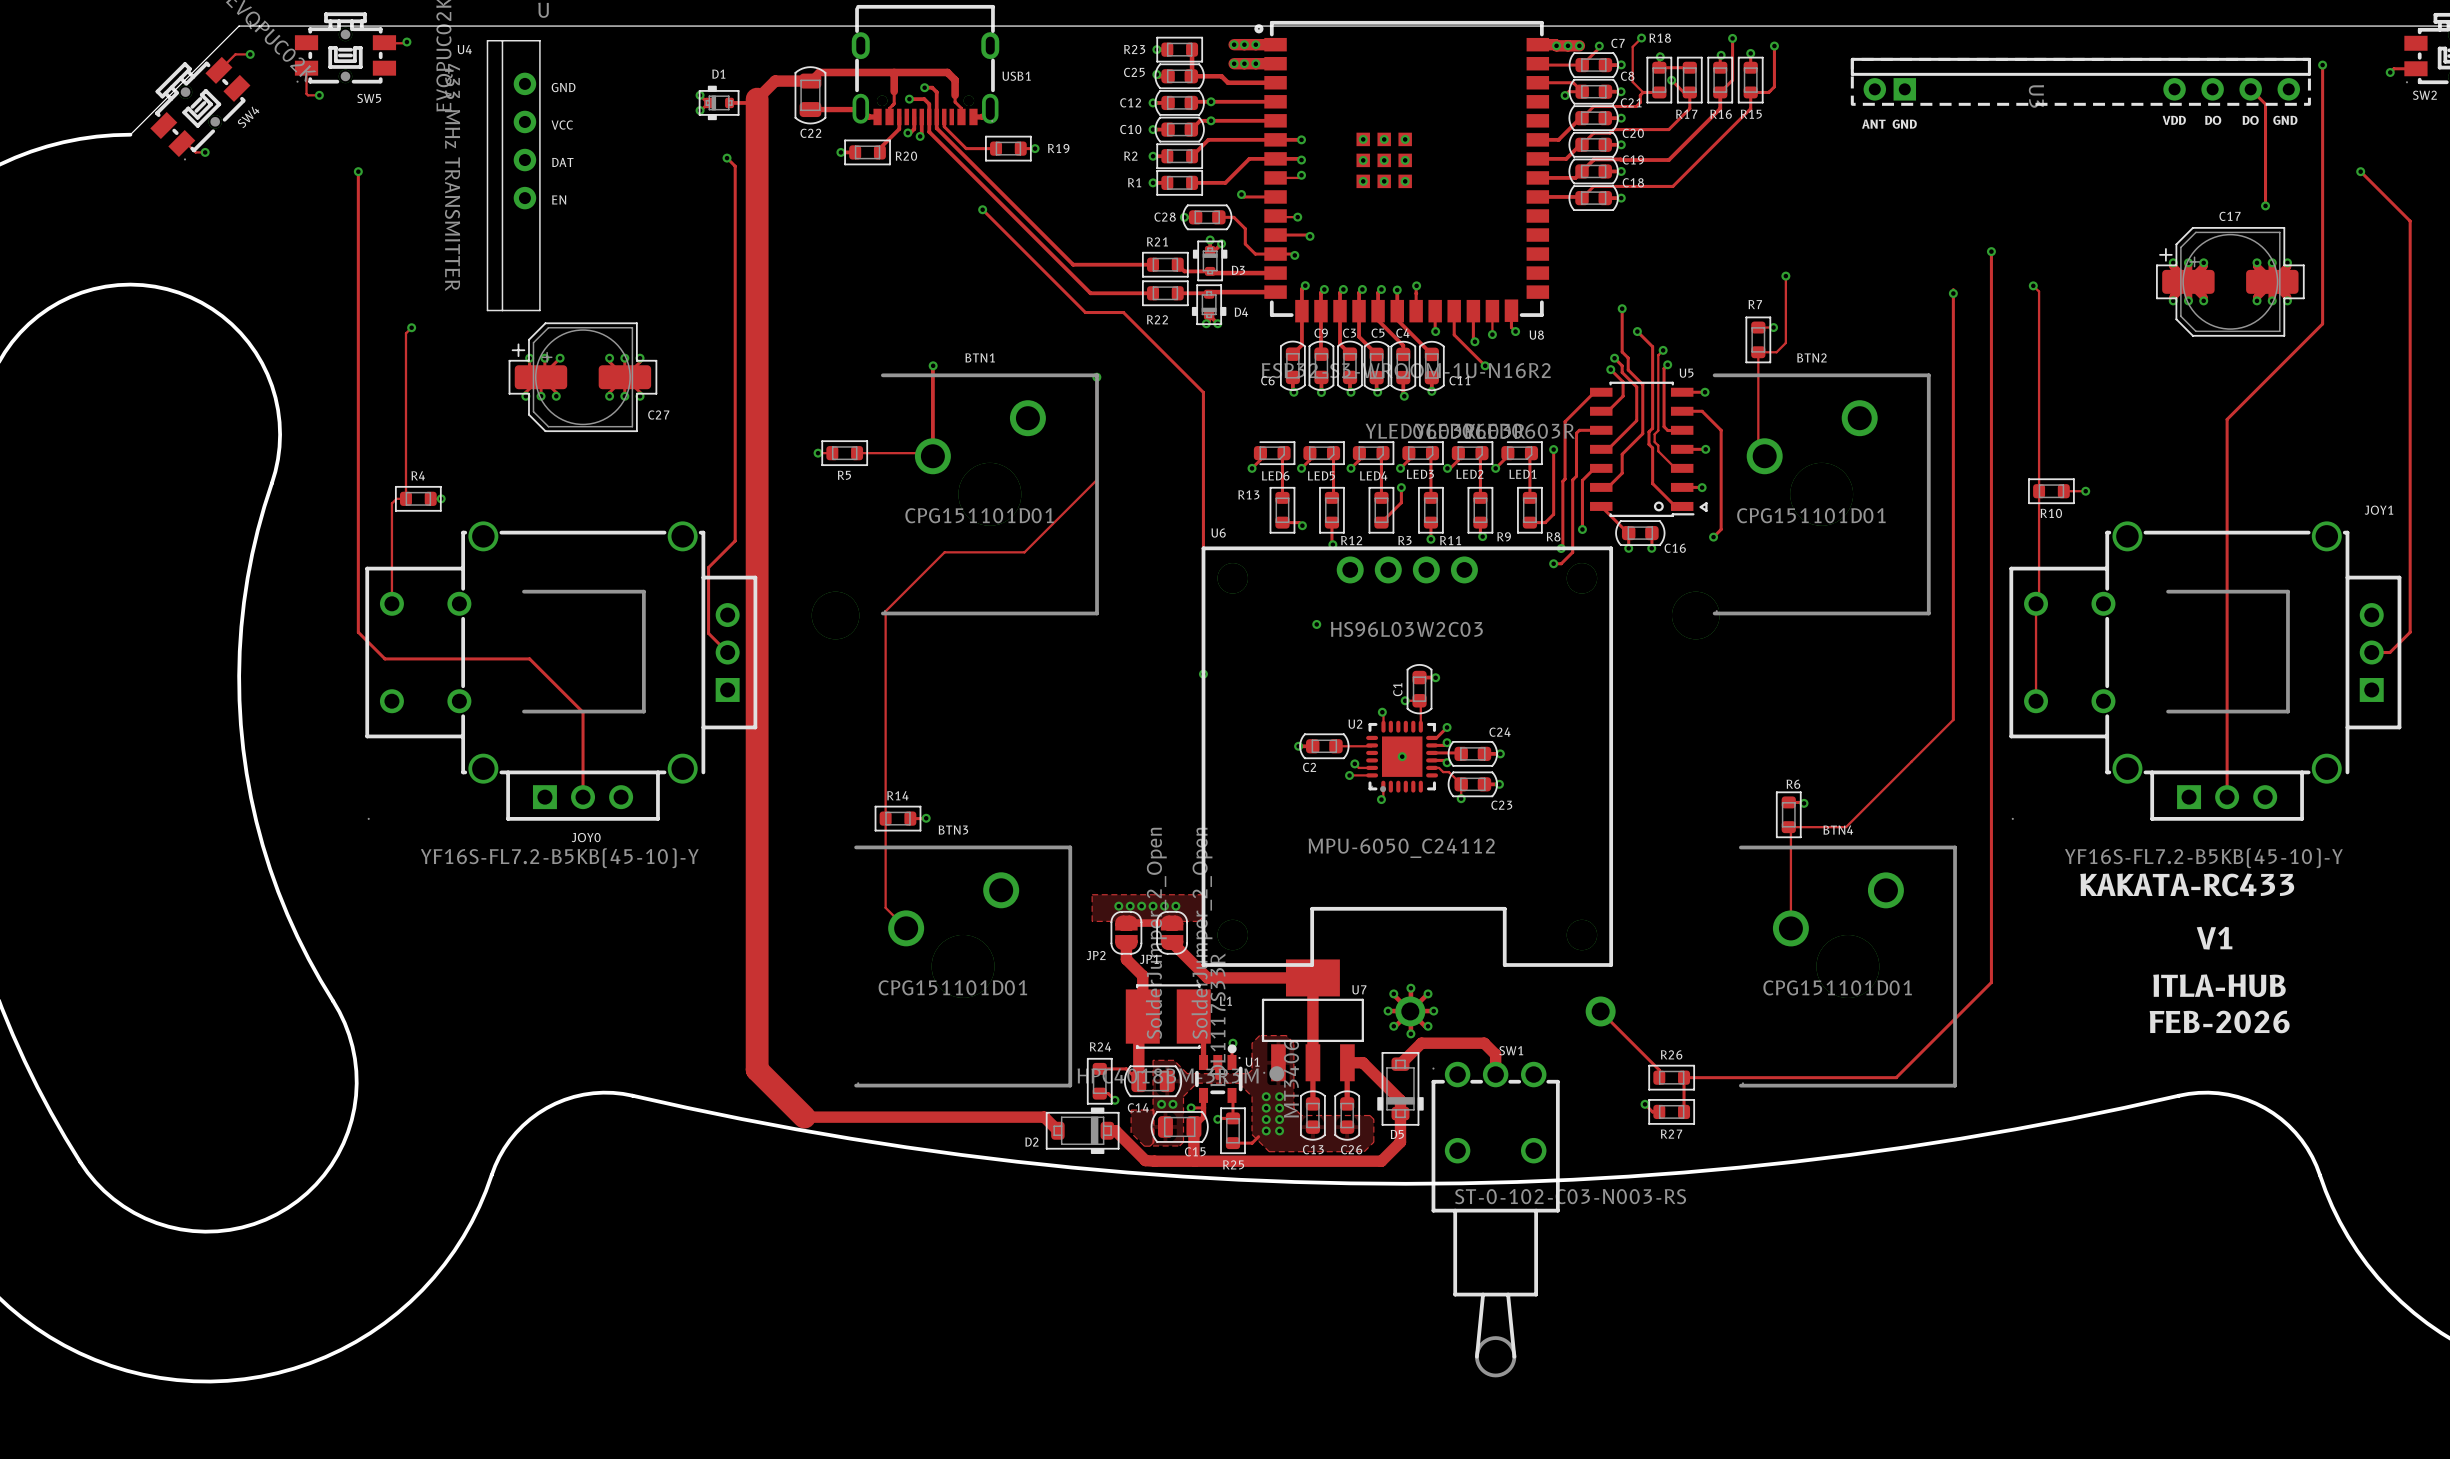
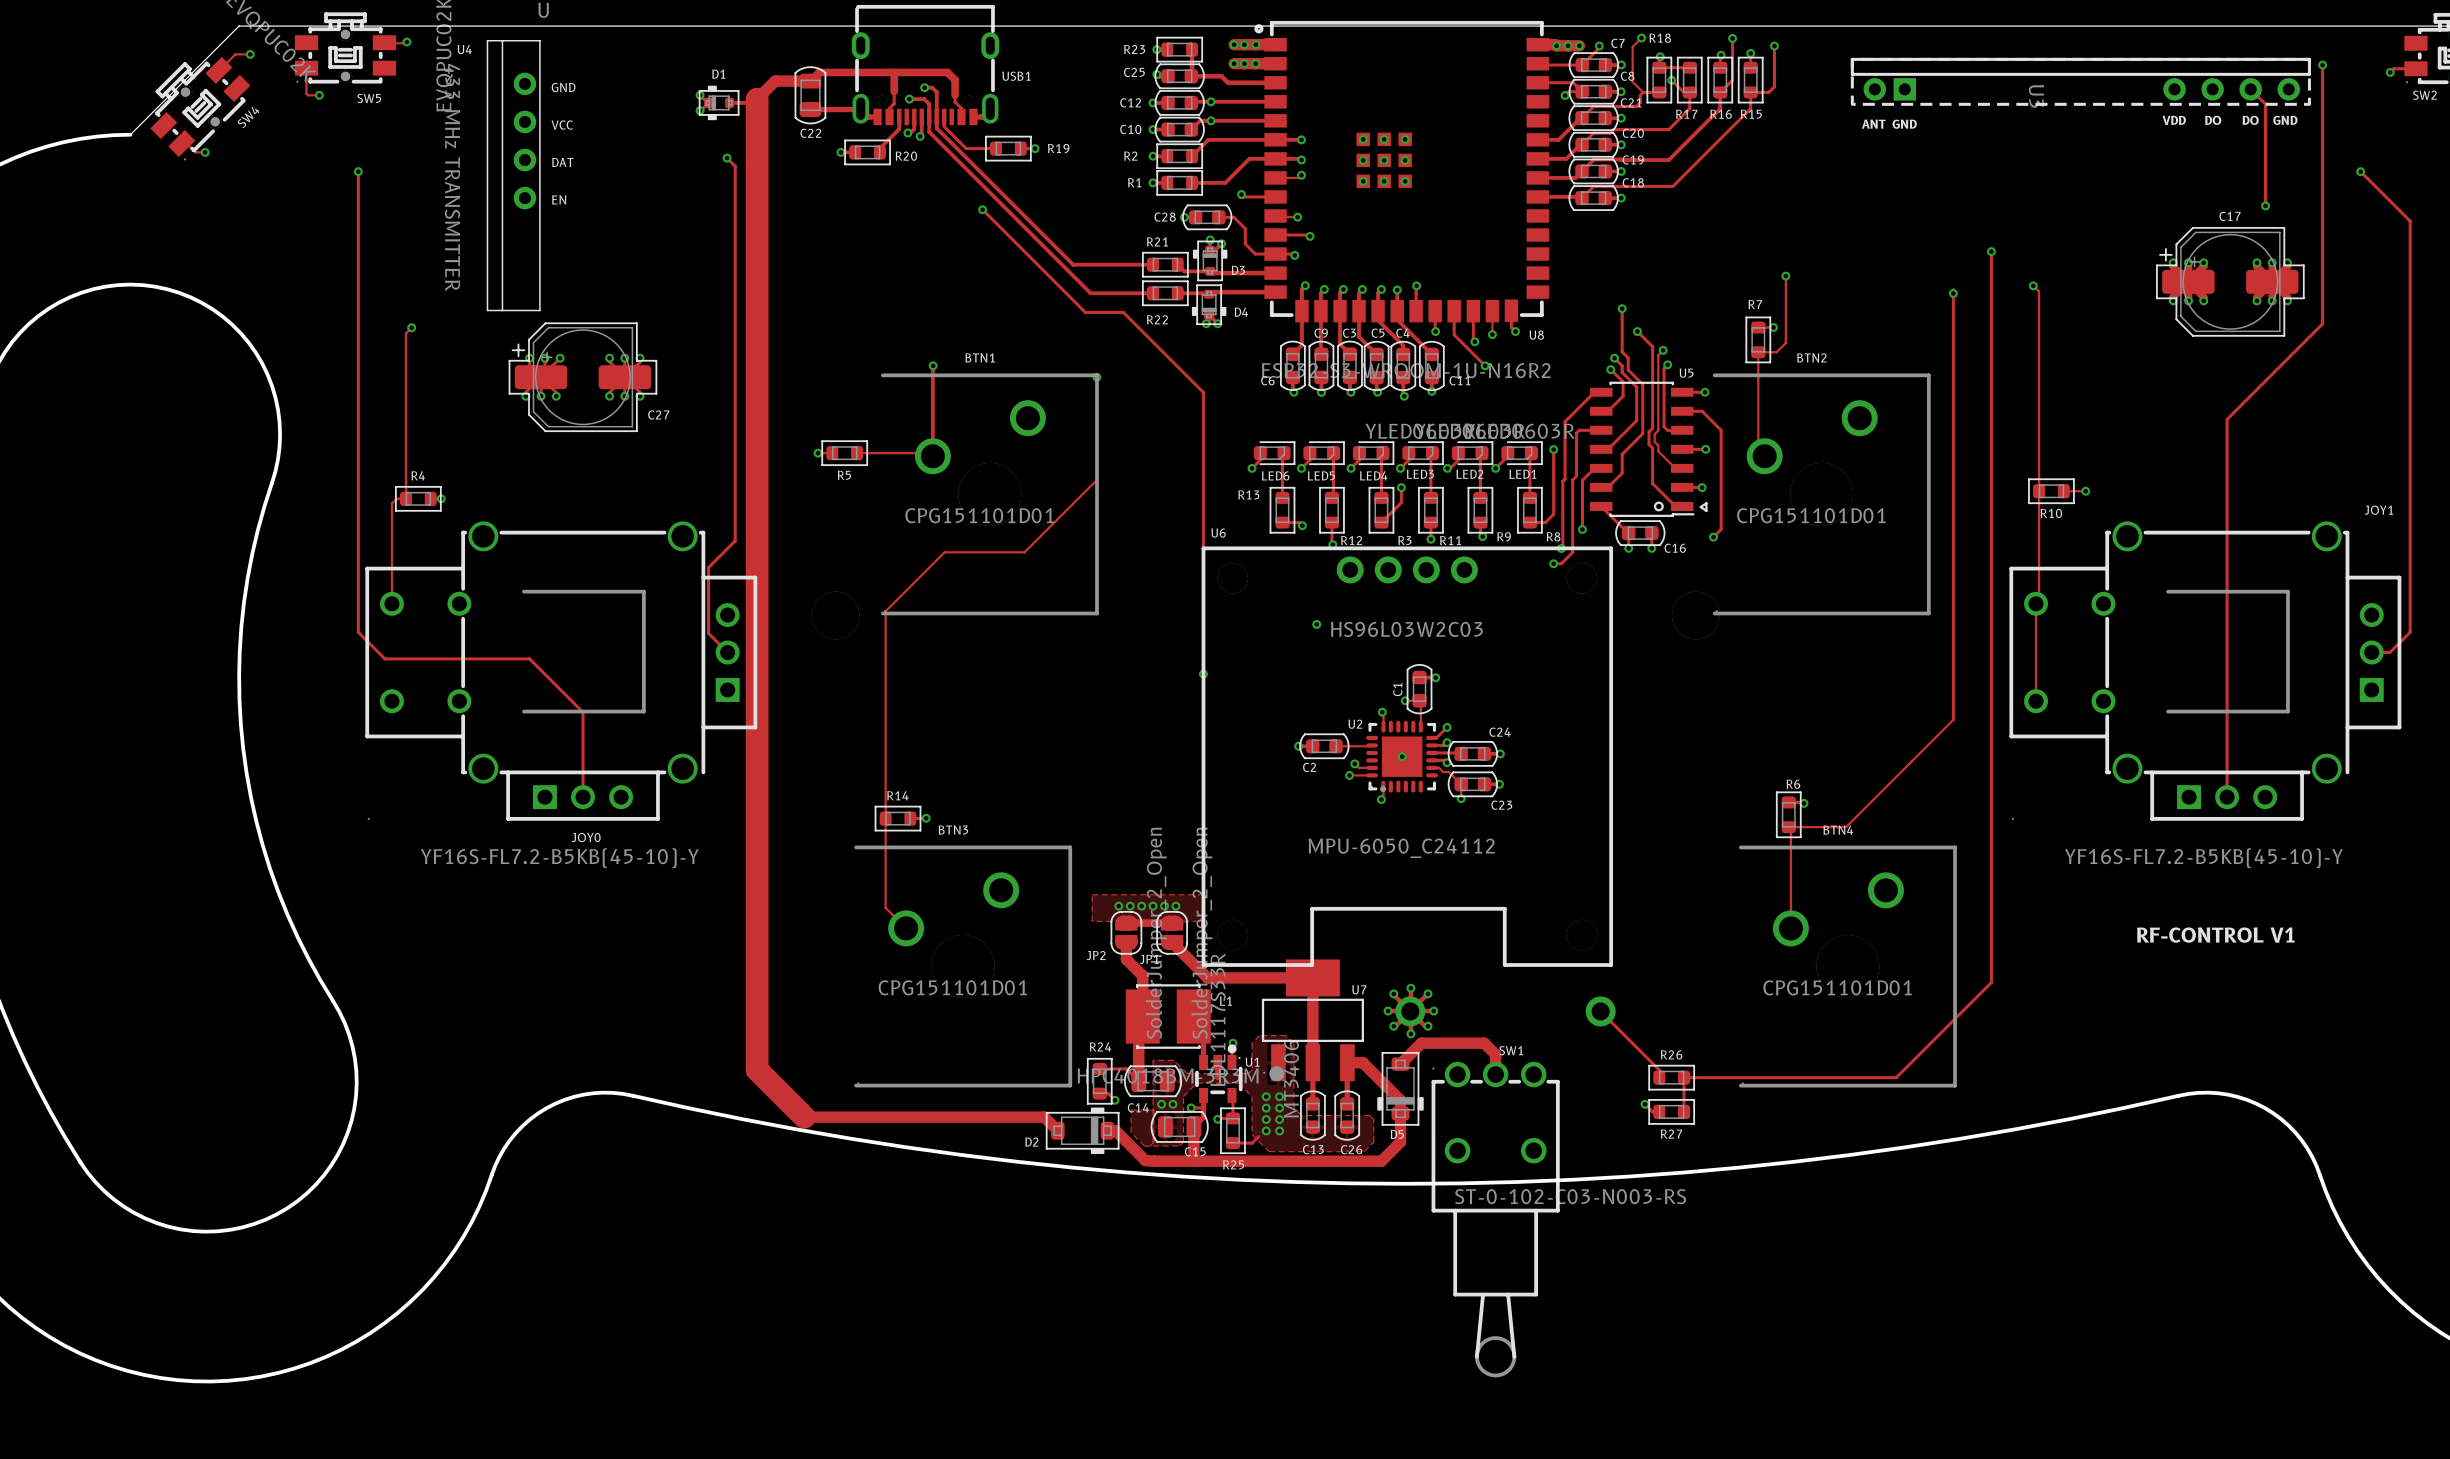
text: KAKATA-RC433 (2187, 884) -> none
text: none -> RF-CONTROL V1 (2215, 935)
text: V1 (2214, 938) -> none
text: ITLA-HUB (2219, 985) -> none
text: FEB-2026 (2219, 1022) -> none

